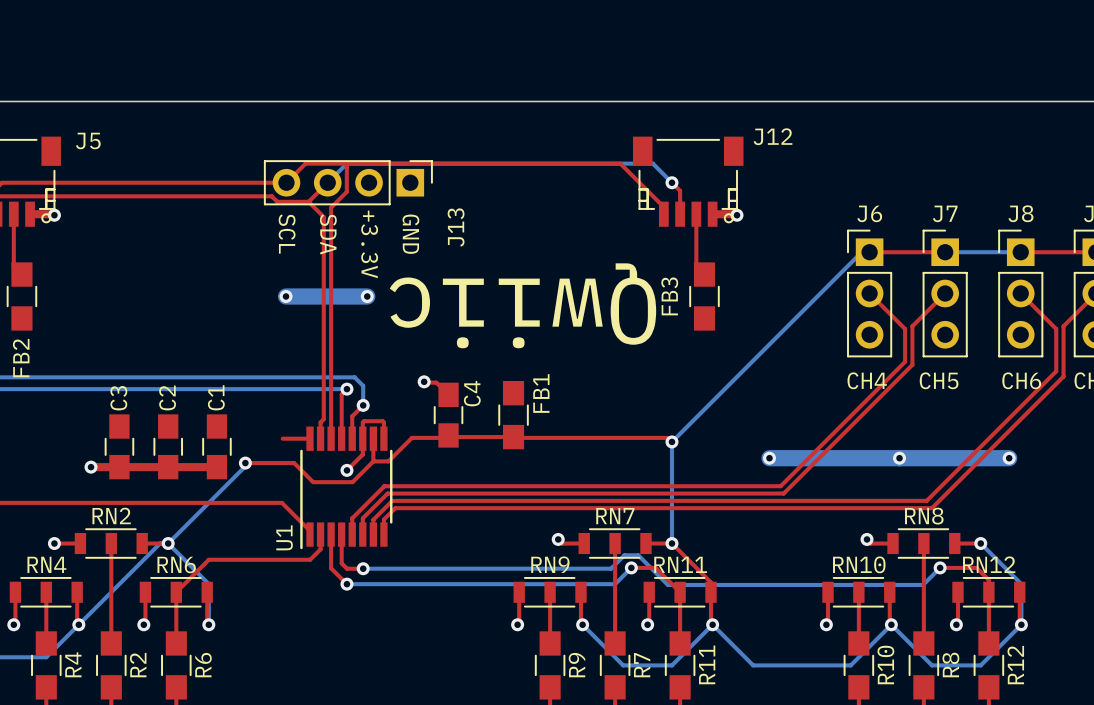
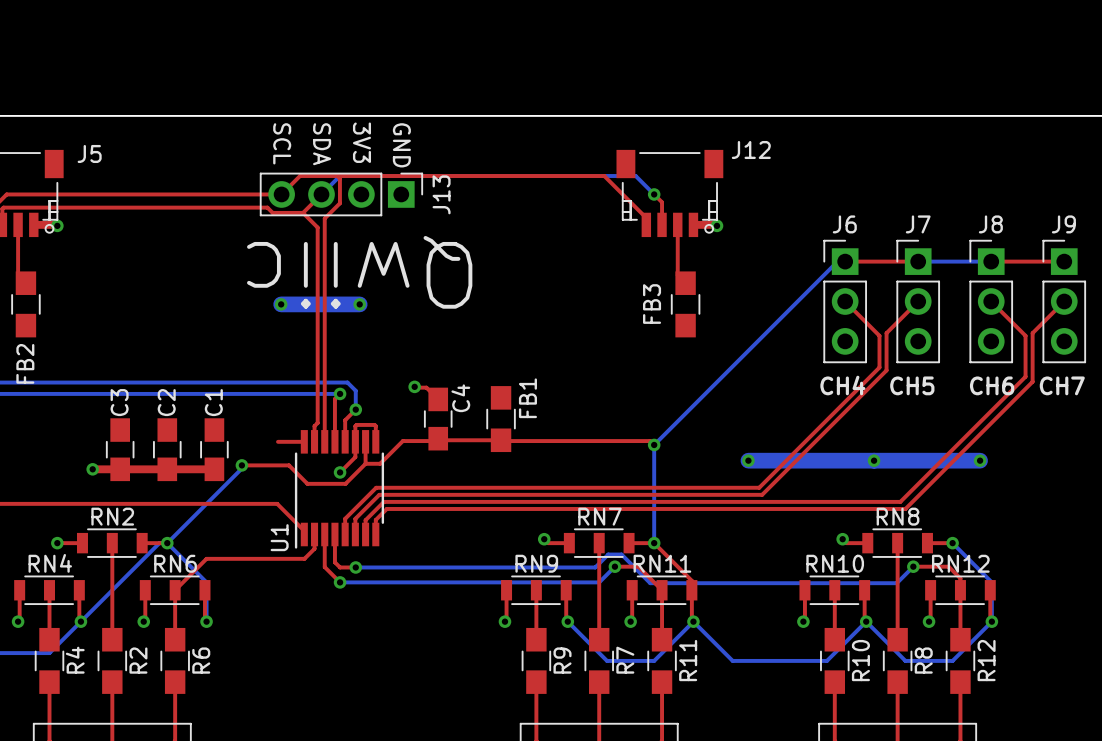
text: none -> 3V3 (361, 142)
J13 name position: J13 (456, 227) -> J13 (441, 194)
text position: SCL (287, 233) -> SCL (282, 143)
text position: SDA (328, 234) -> SDA (322, 144)
text position: GND (410, 234) -> GND (401, 145)
text: +3.3V (369, 244) -> none
text position: Qwiic (522, 305) -> Qwiic (359, 272)

